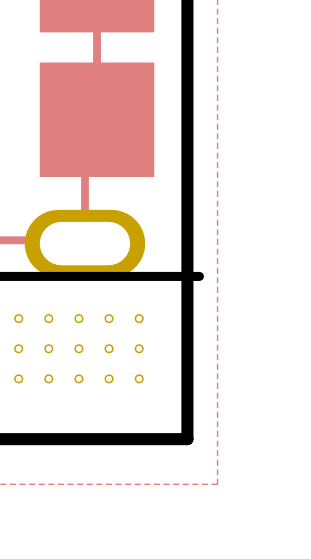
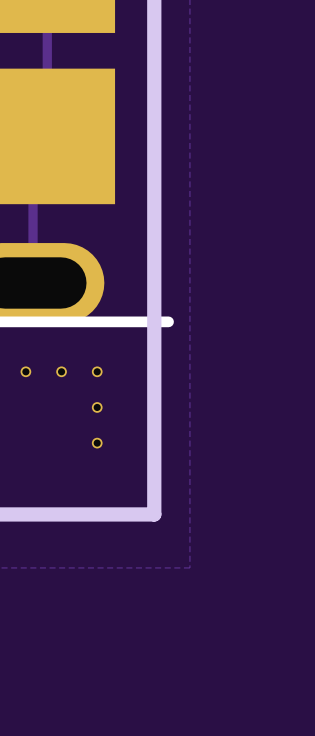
part: (78, 348) -> none
part: (109, 348) -> none
part: (78, 378) -> none
part: (109, 378) -> none

